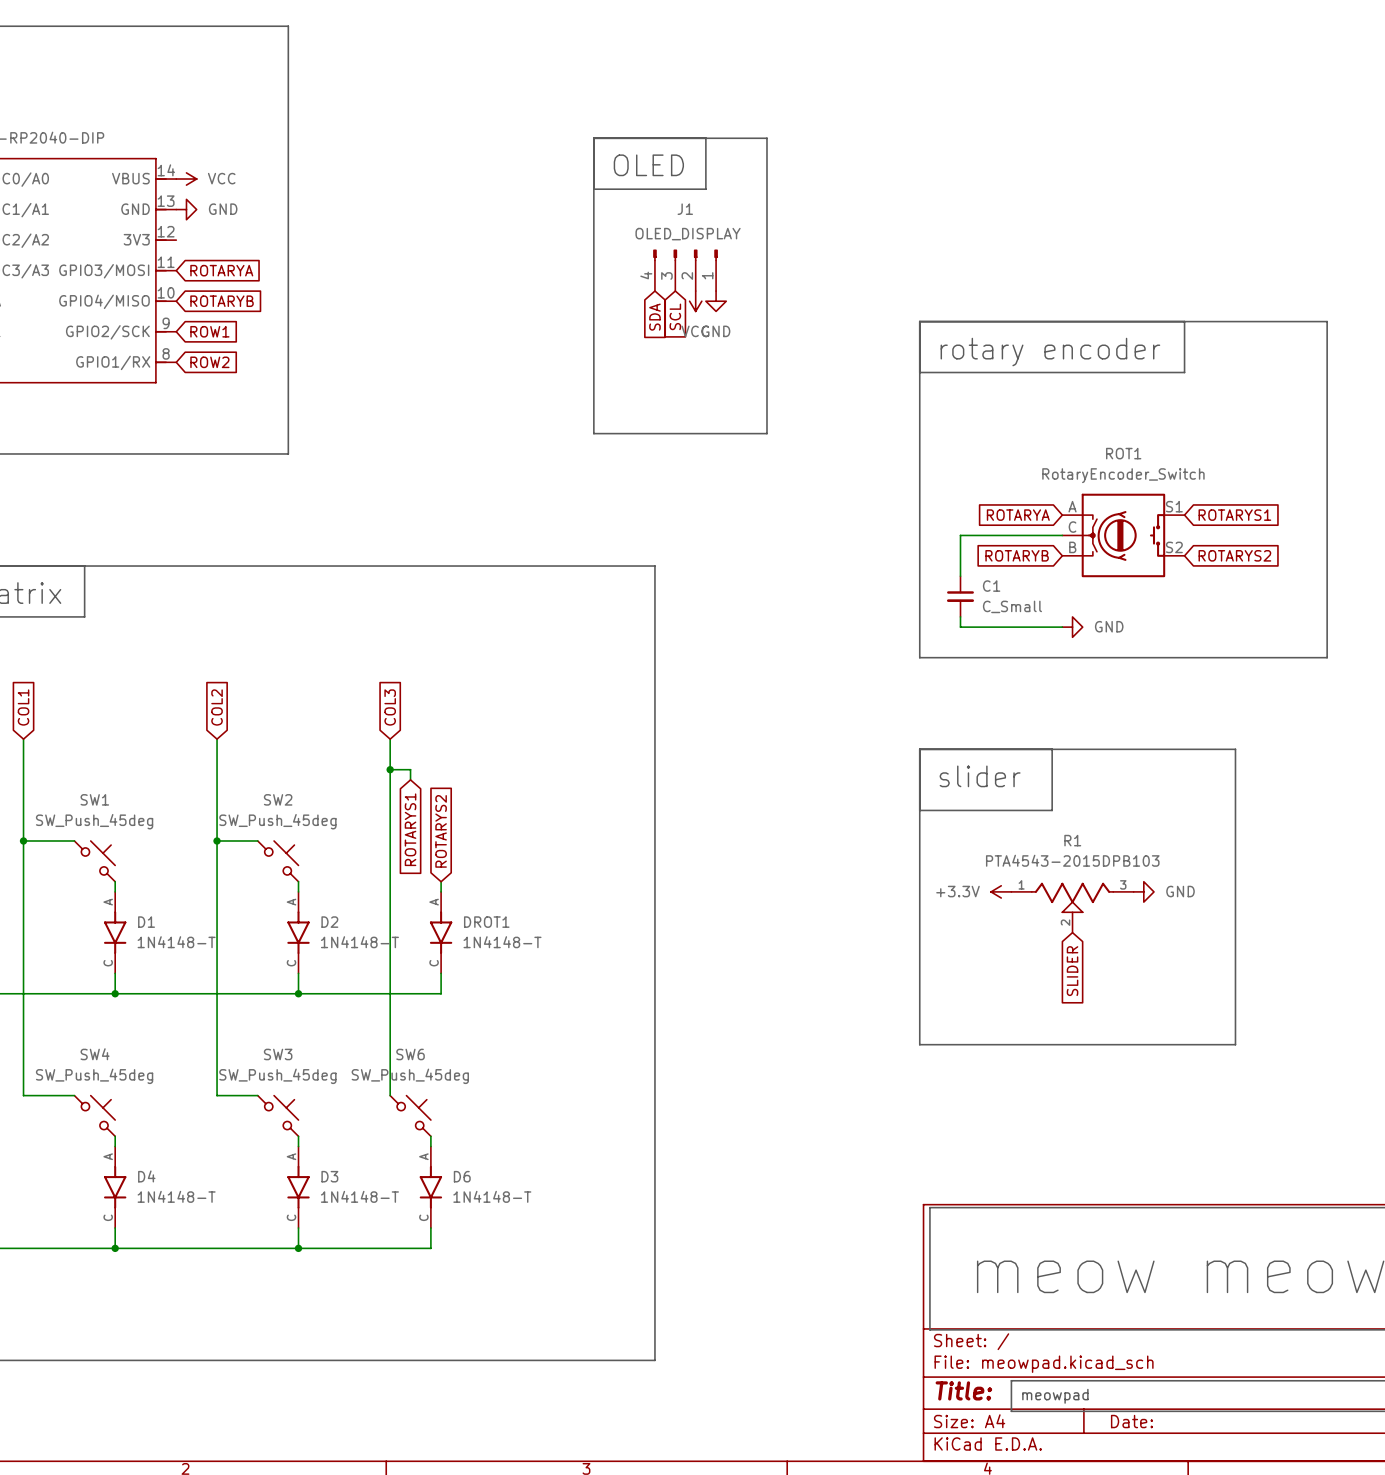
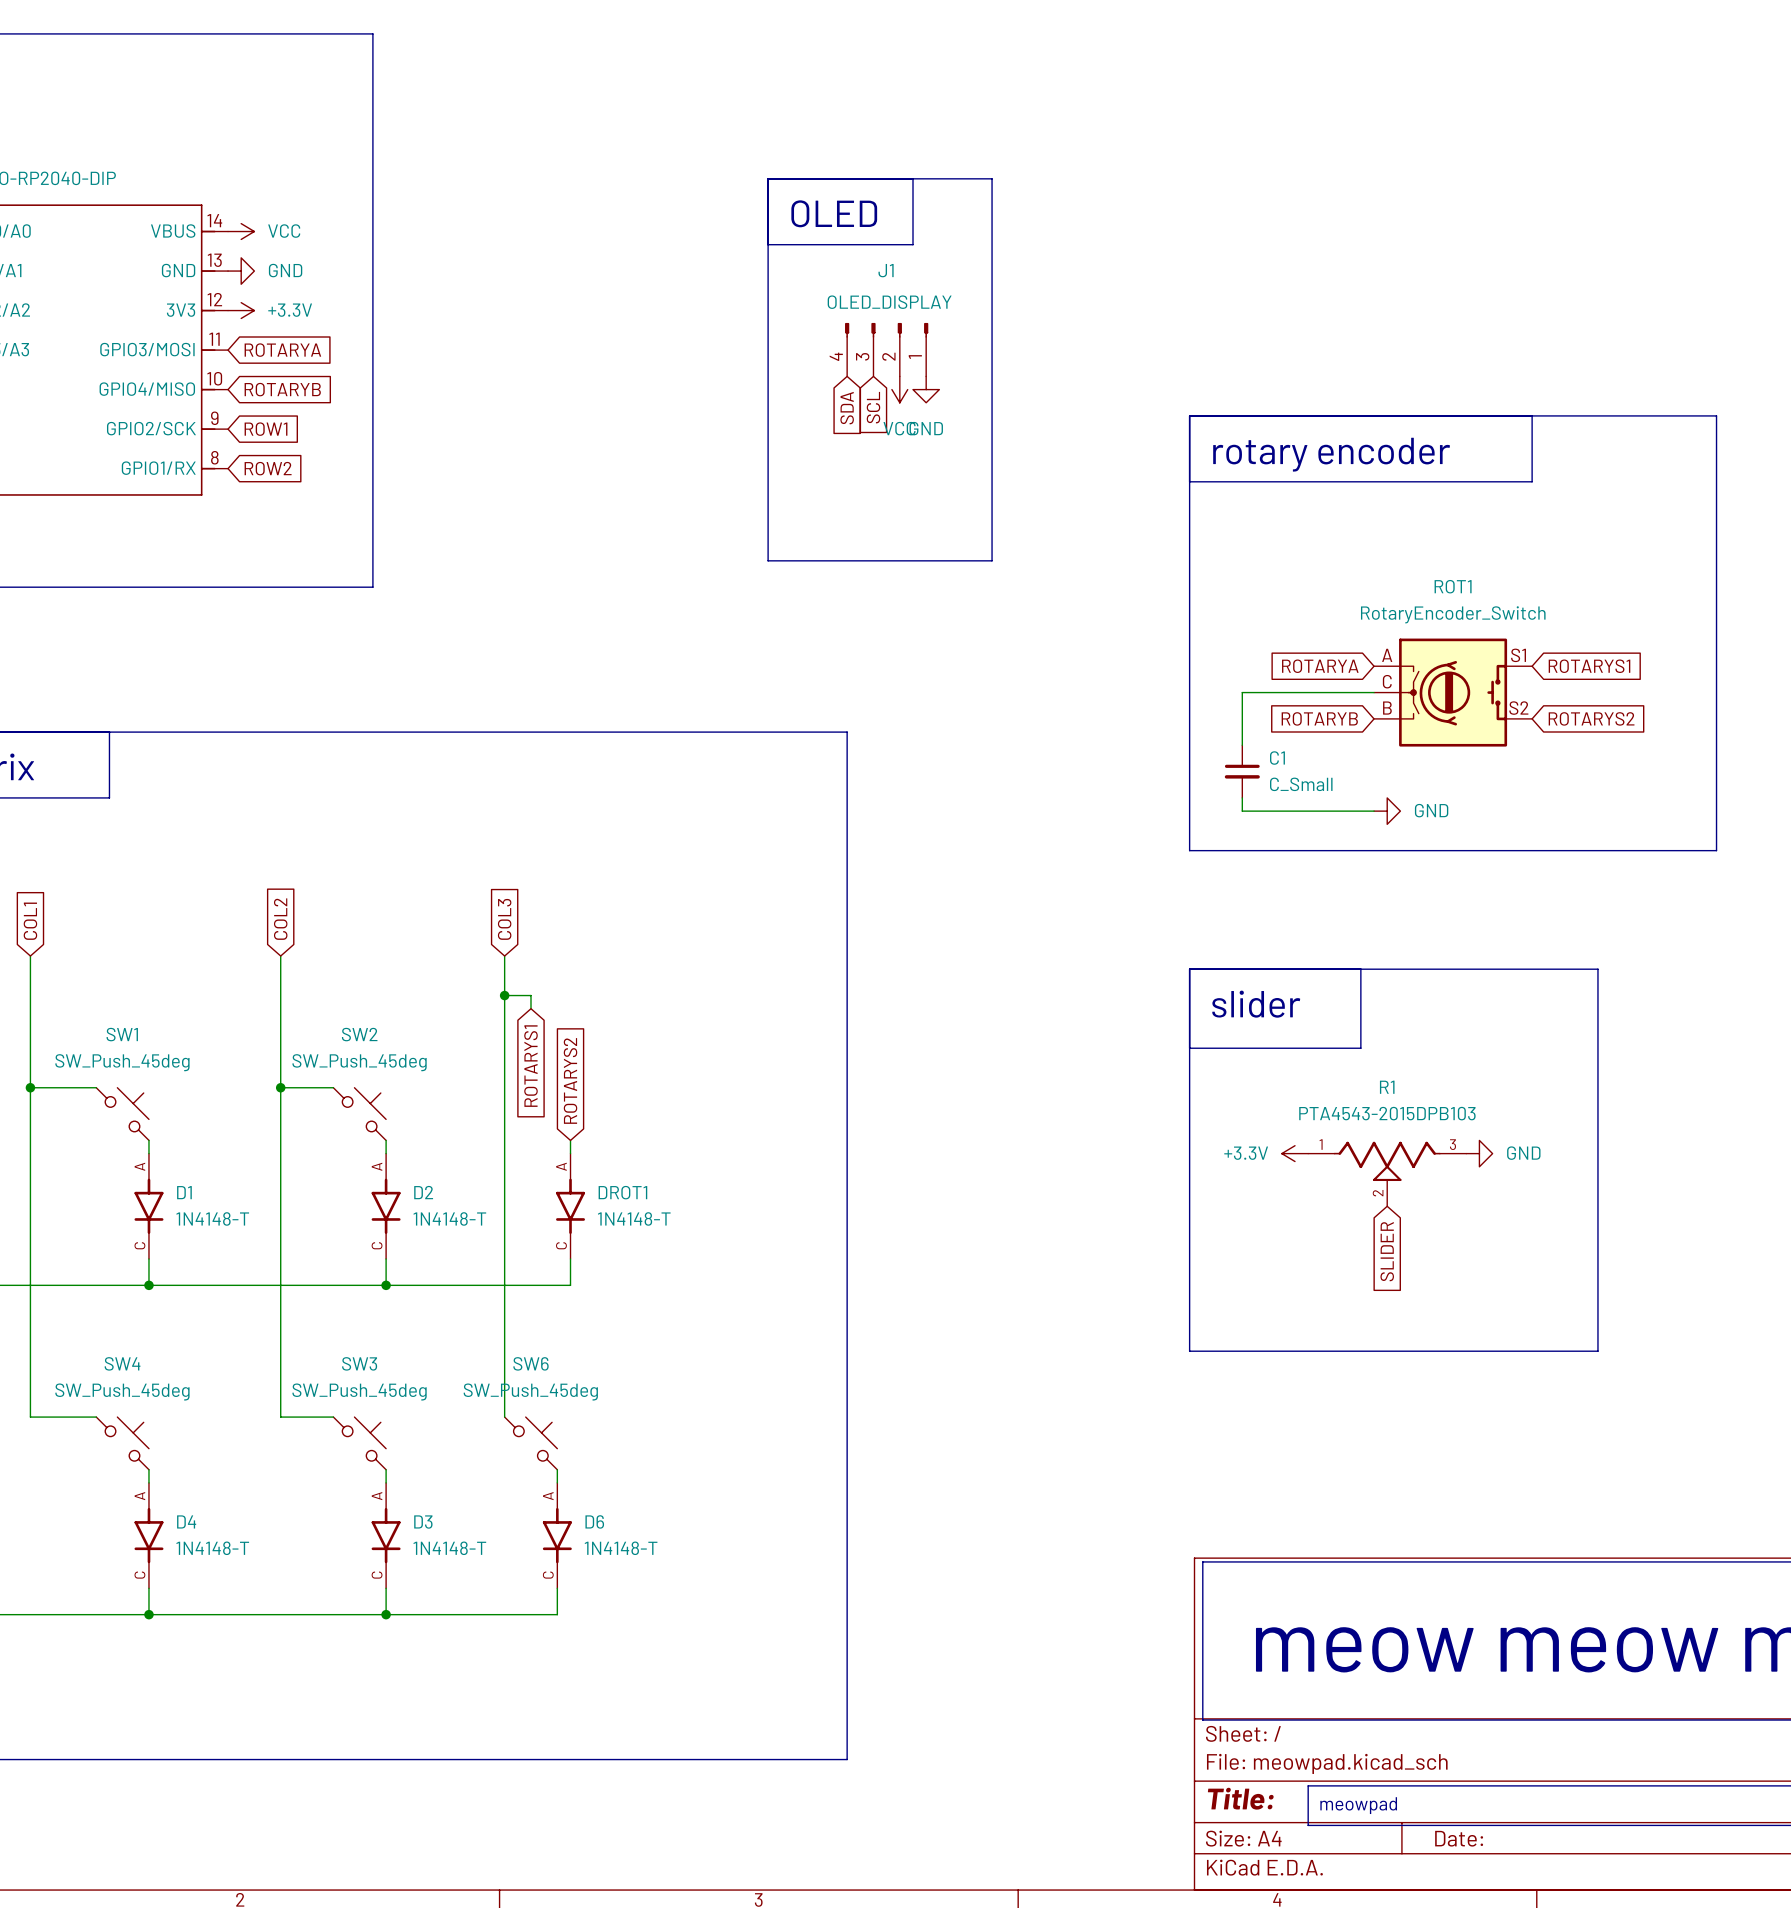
power symbol: none -> +3.3V (241, 310)

